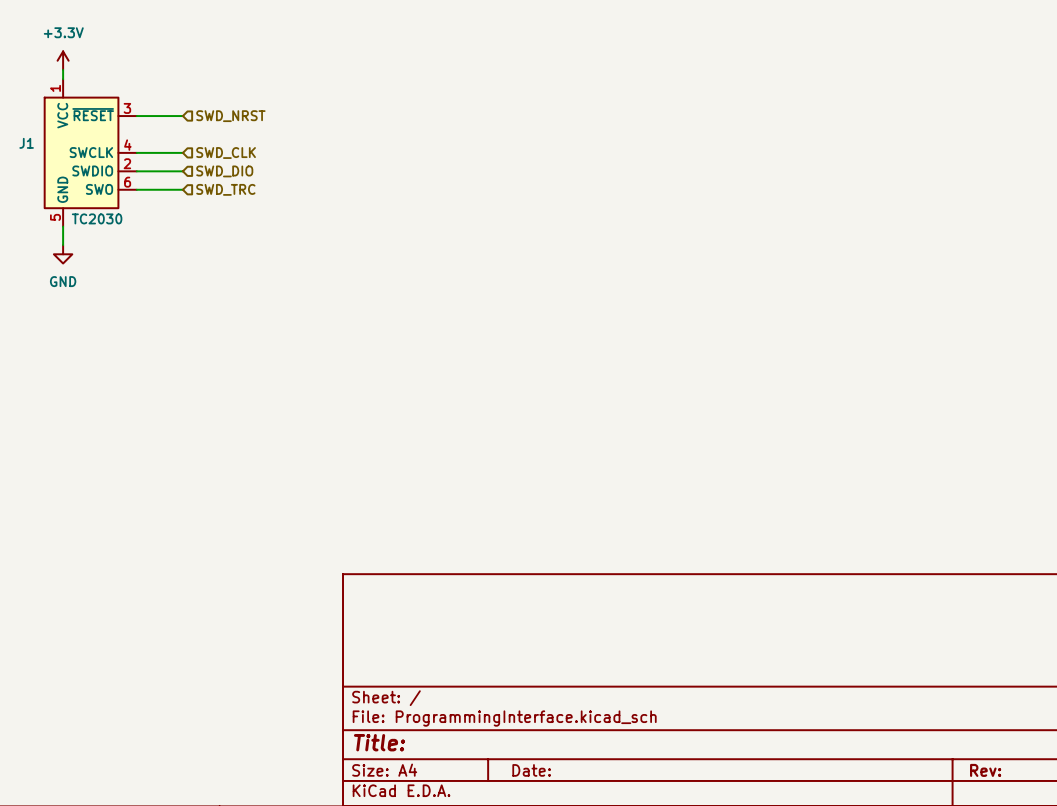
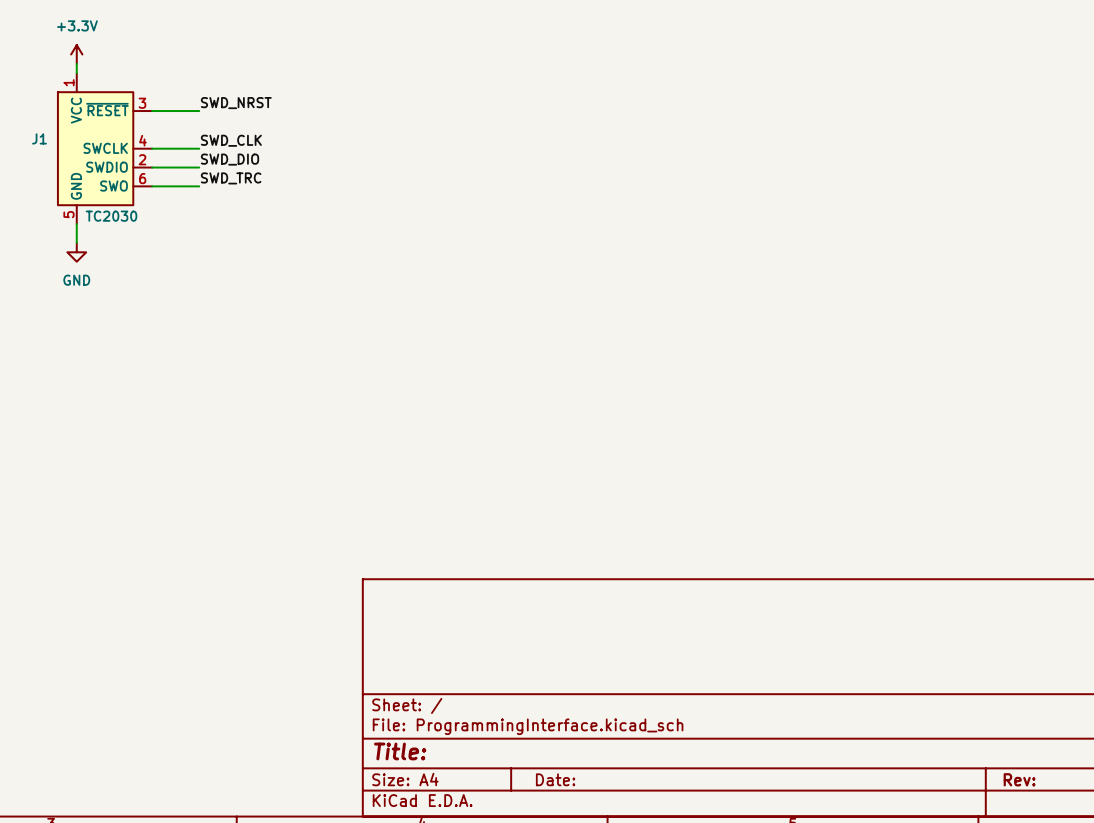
label: none -> SWD_NRST (236, 103)
hierarchical label: SWD_NRST (230, 116) -> none
label: none -> SWD_CLK (231, 140)
hierarchical label: SWD_CLK (226, 153) -> none
label: none -> SWD_DIO (230, 159)
hierarchical label: SWD_DIO (224, 171) -> none
label: none -> SWD_TRC (231, 178)
hierarchical label: SWD_TRC (225, 189) -> none

